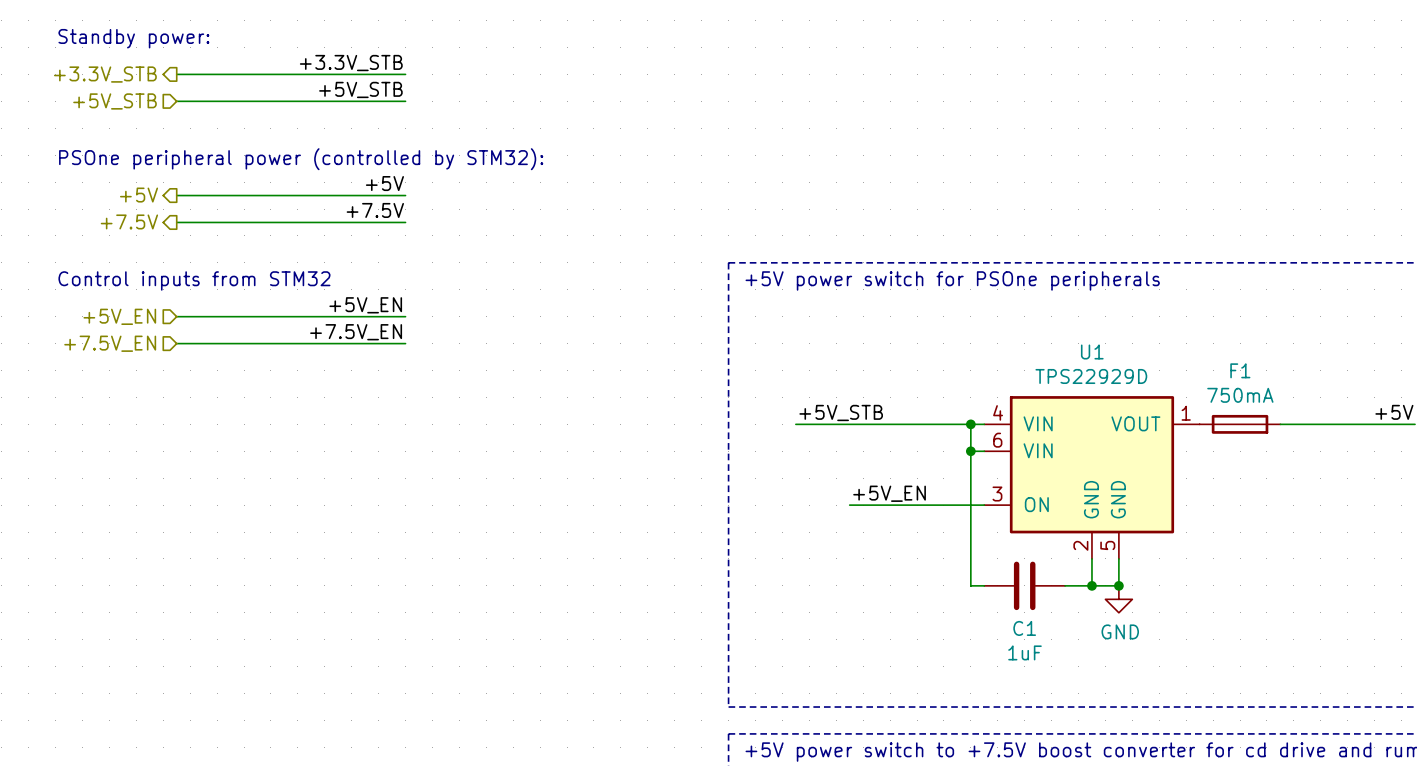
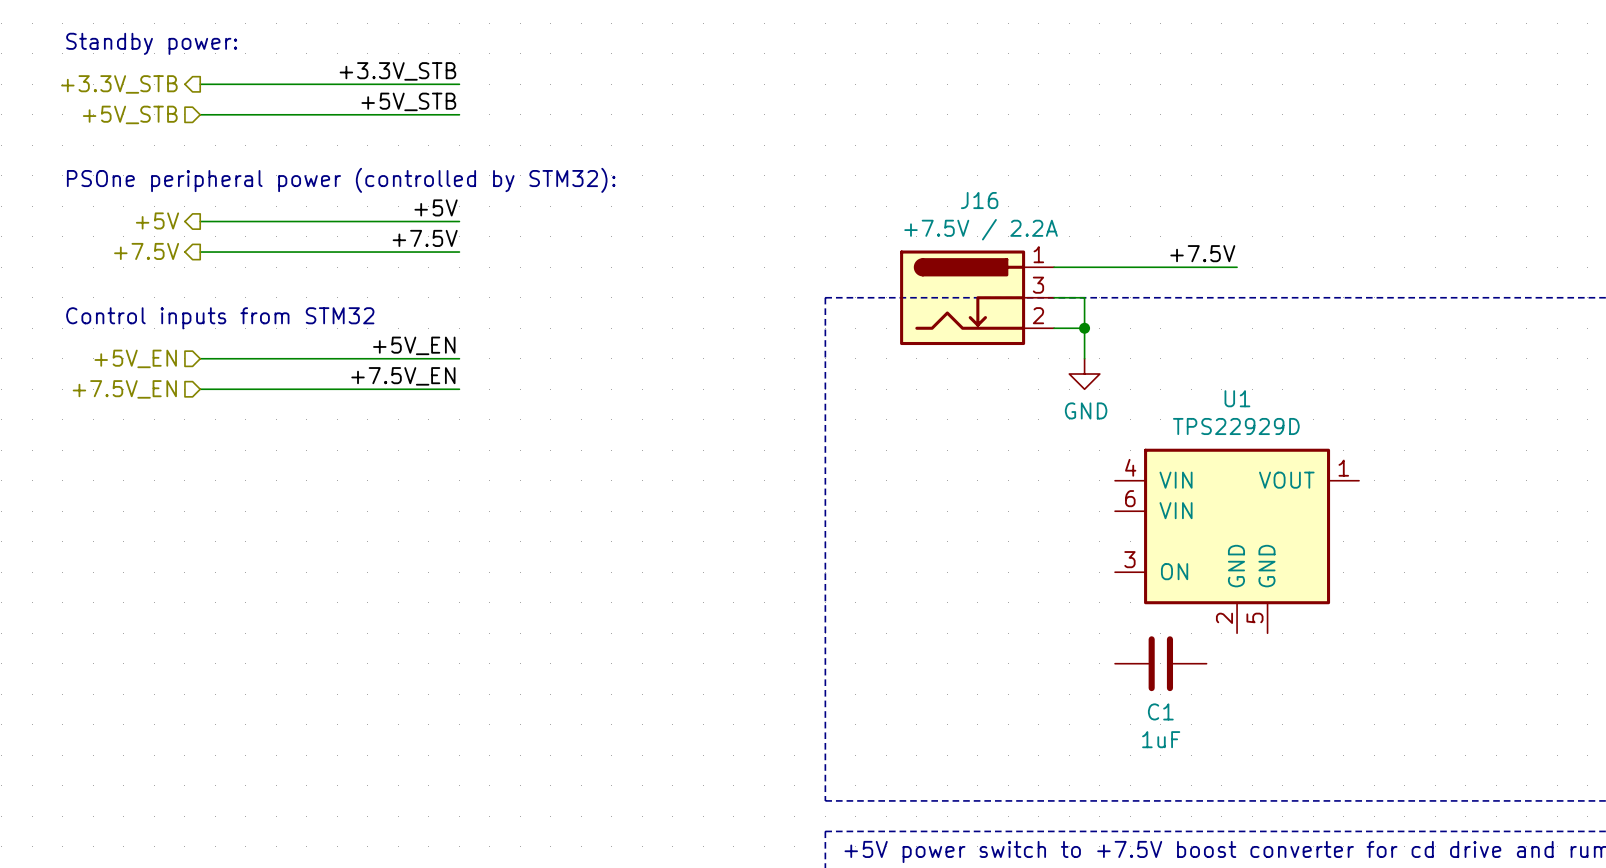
label: none -> +7.5V (1202, 253)
wire: none -> (1054, 267) (1237, 267)
J16: none -> +7.5V / 2.2A (977, 297)
wire: none -> (1054, 297) (1084, 297) (1084, 358)
text: +5V power switch for PSOne peripherals (952, 280) -> none
wire: none -> (1054, 328) (1084, 328)
junction: none -> (1084, 328)
power symbol: none -> GND (1084, 374)
label: +5V_STB (841, 412) -> none
label: +5V (1394, 412) -> none
wire: (795, 424) (984, 424) -> none
wire: (970, 424) (970, 585) (984, 585) -> none
junction: (970, 424) -> none
F1: 750mA (1240, 424) -> none
wire: (1280, 424) (1415, 424) -> none
wire: (970, 451) (984, 451) -> none
junction: (970, 451) -> none
label: +5V_EN (889, 493) -> none
wire: (849, 505) (984, 505) -> none
wire: (1091, 558) (1091, 585) -> none
wire: (1118, 558) (1118, 585) (1065, 585) -> none
junction: (1091, 585) -> none
junction: (1118, 585) -> none
power symbol: GND (1118, 599) -> none

